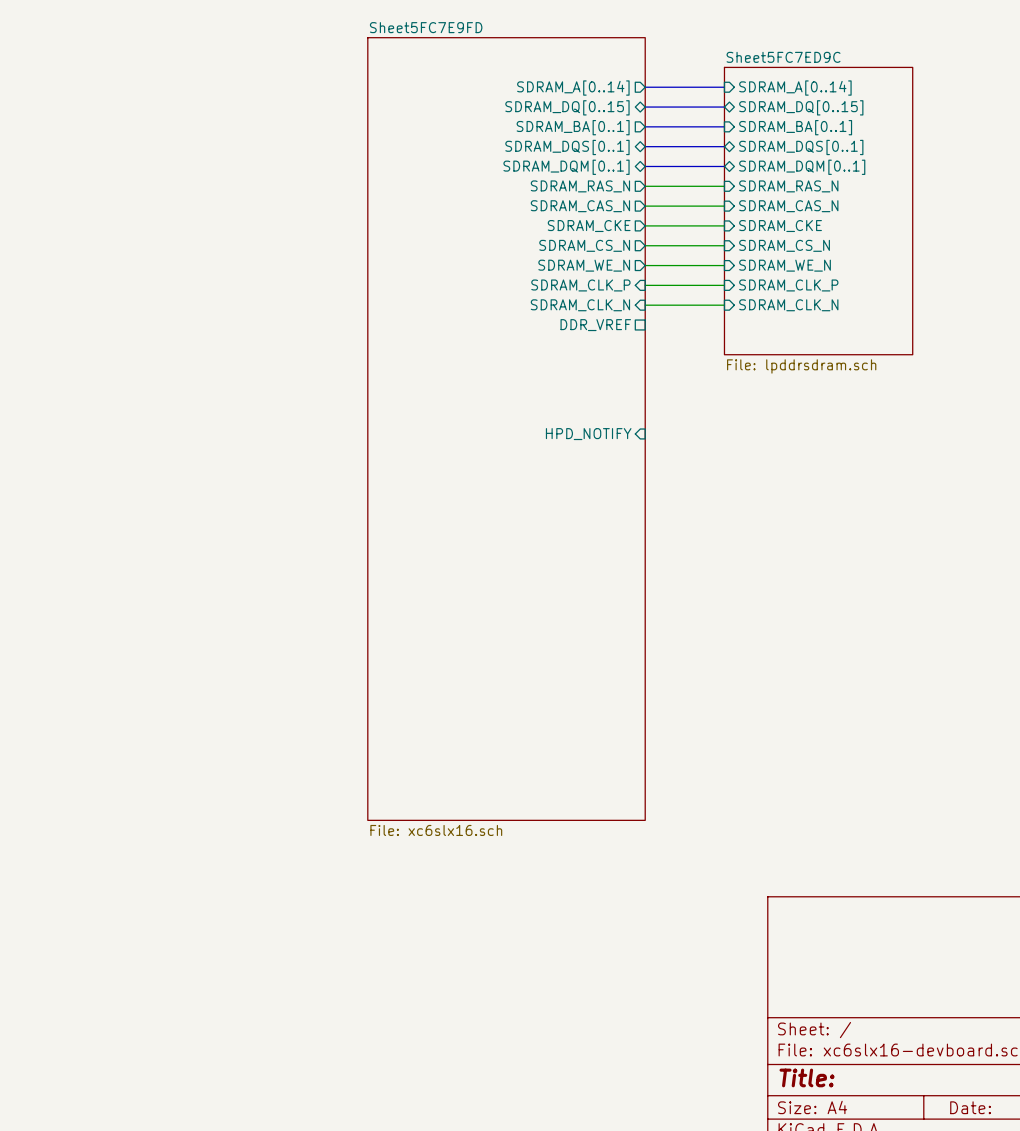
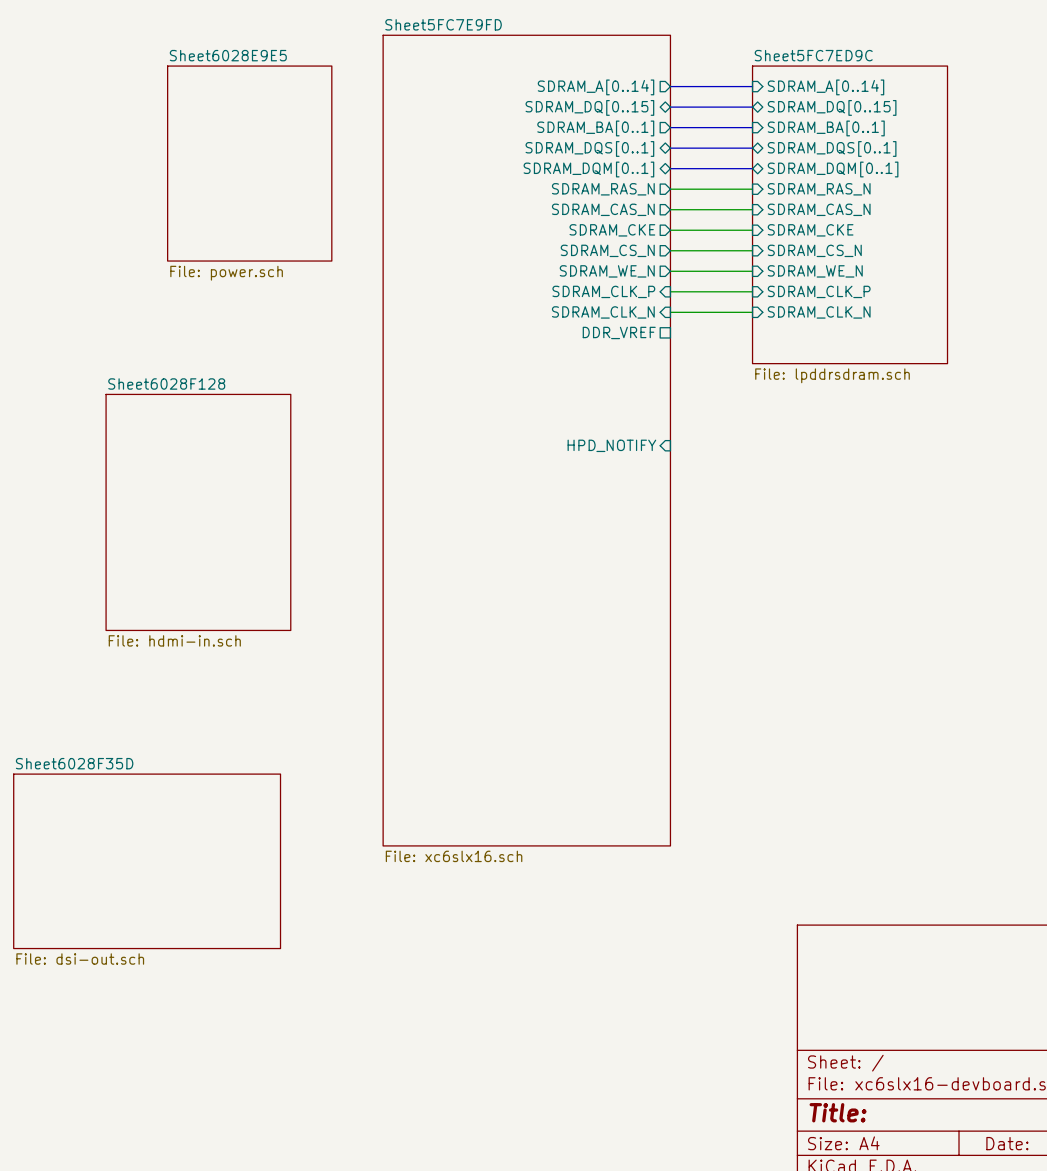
sheet Sheet6028E9E5: none -> File: power.sch (249, 163)
sheet Sheet6028F128: none -> File: hdmi-in.sch (198, 512)
sheet Sheet6028F35D: none -> File: dsi-out.sch (147, 861)

